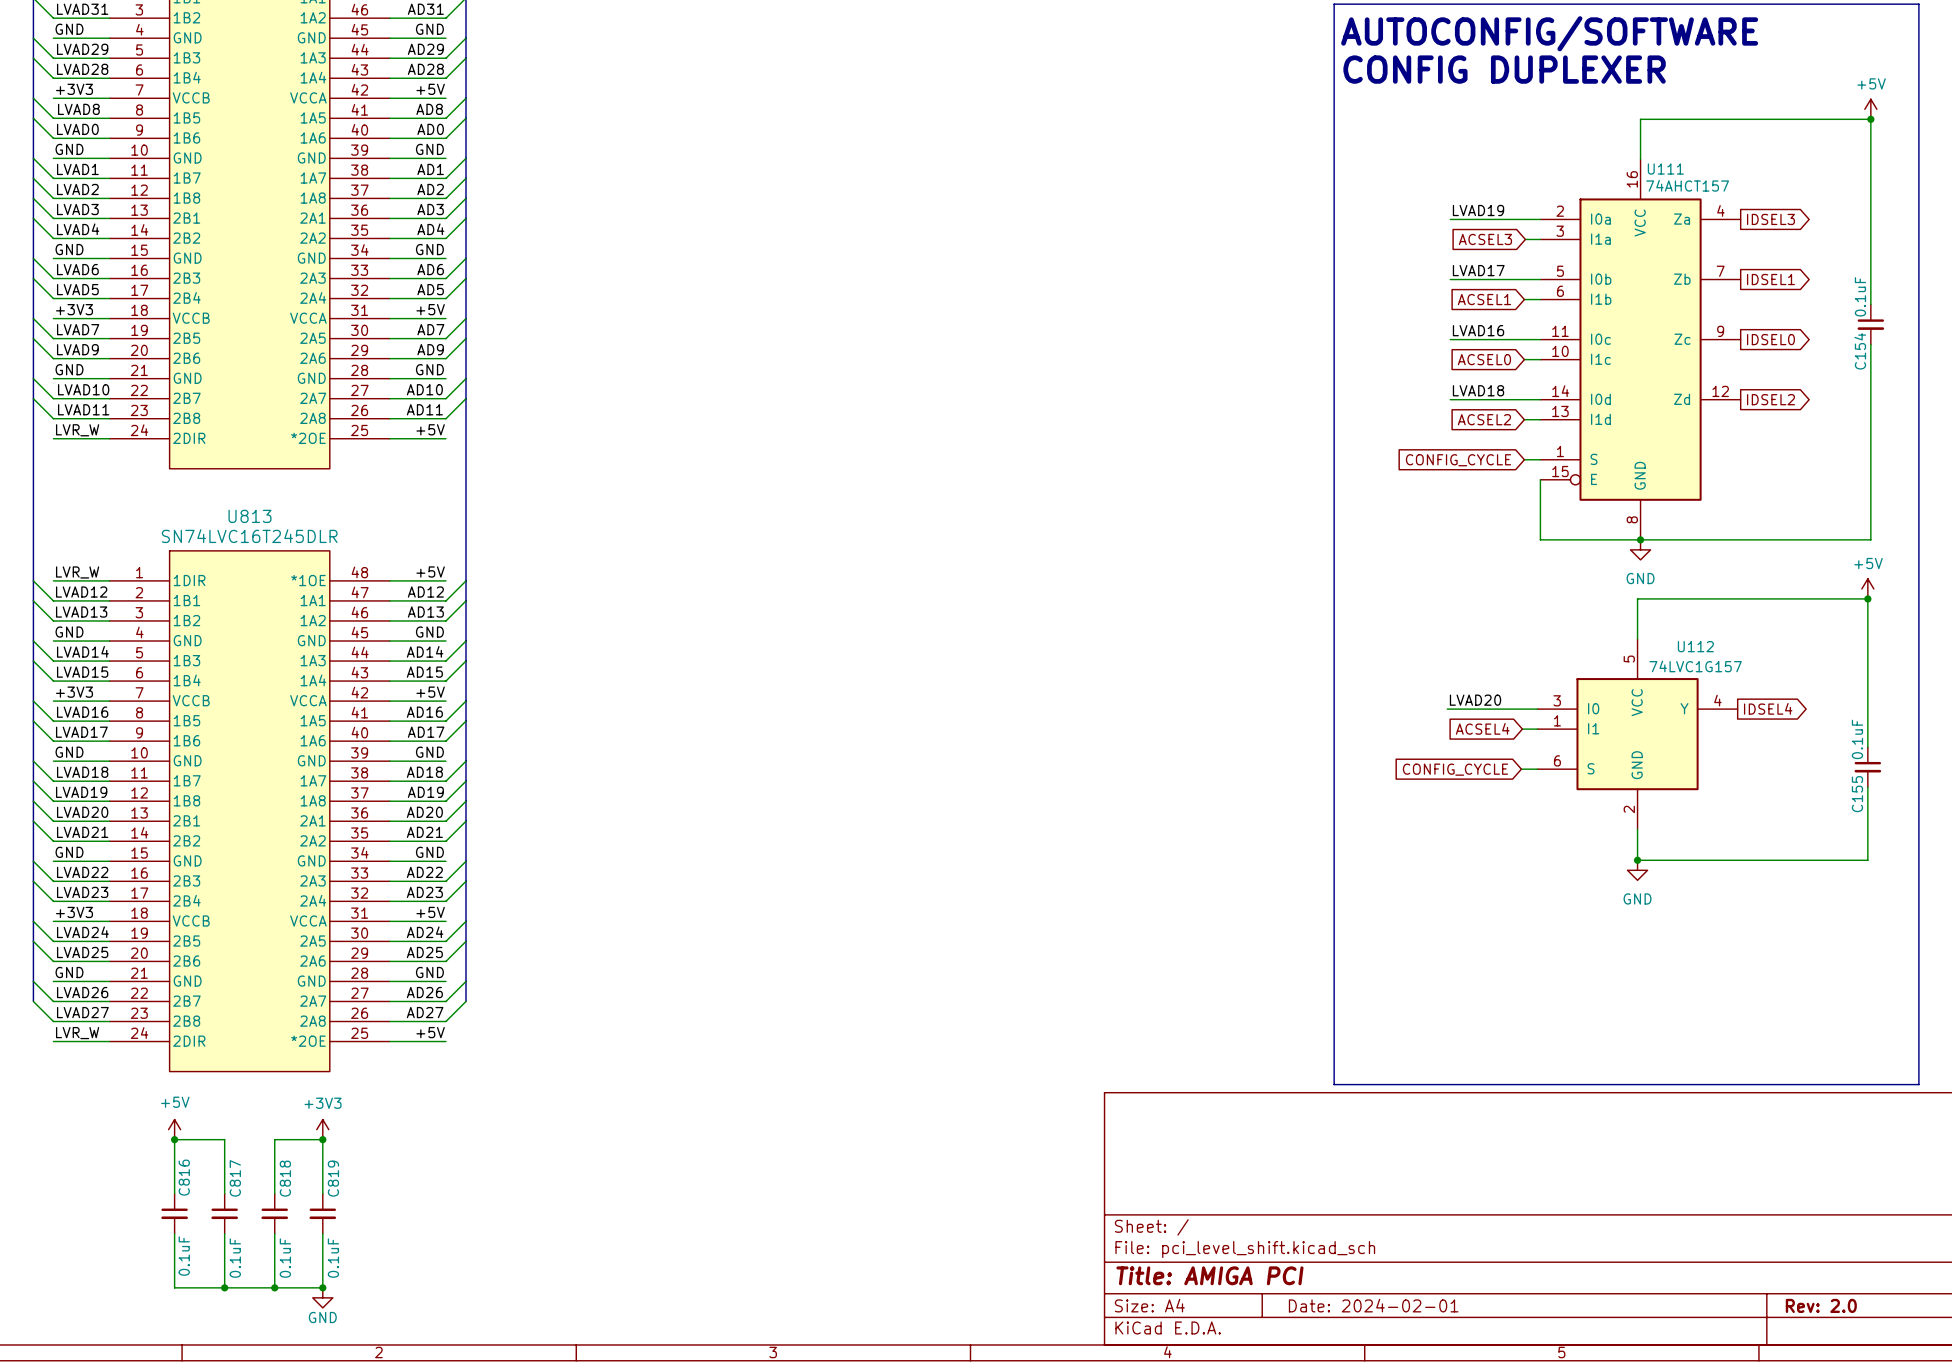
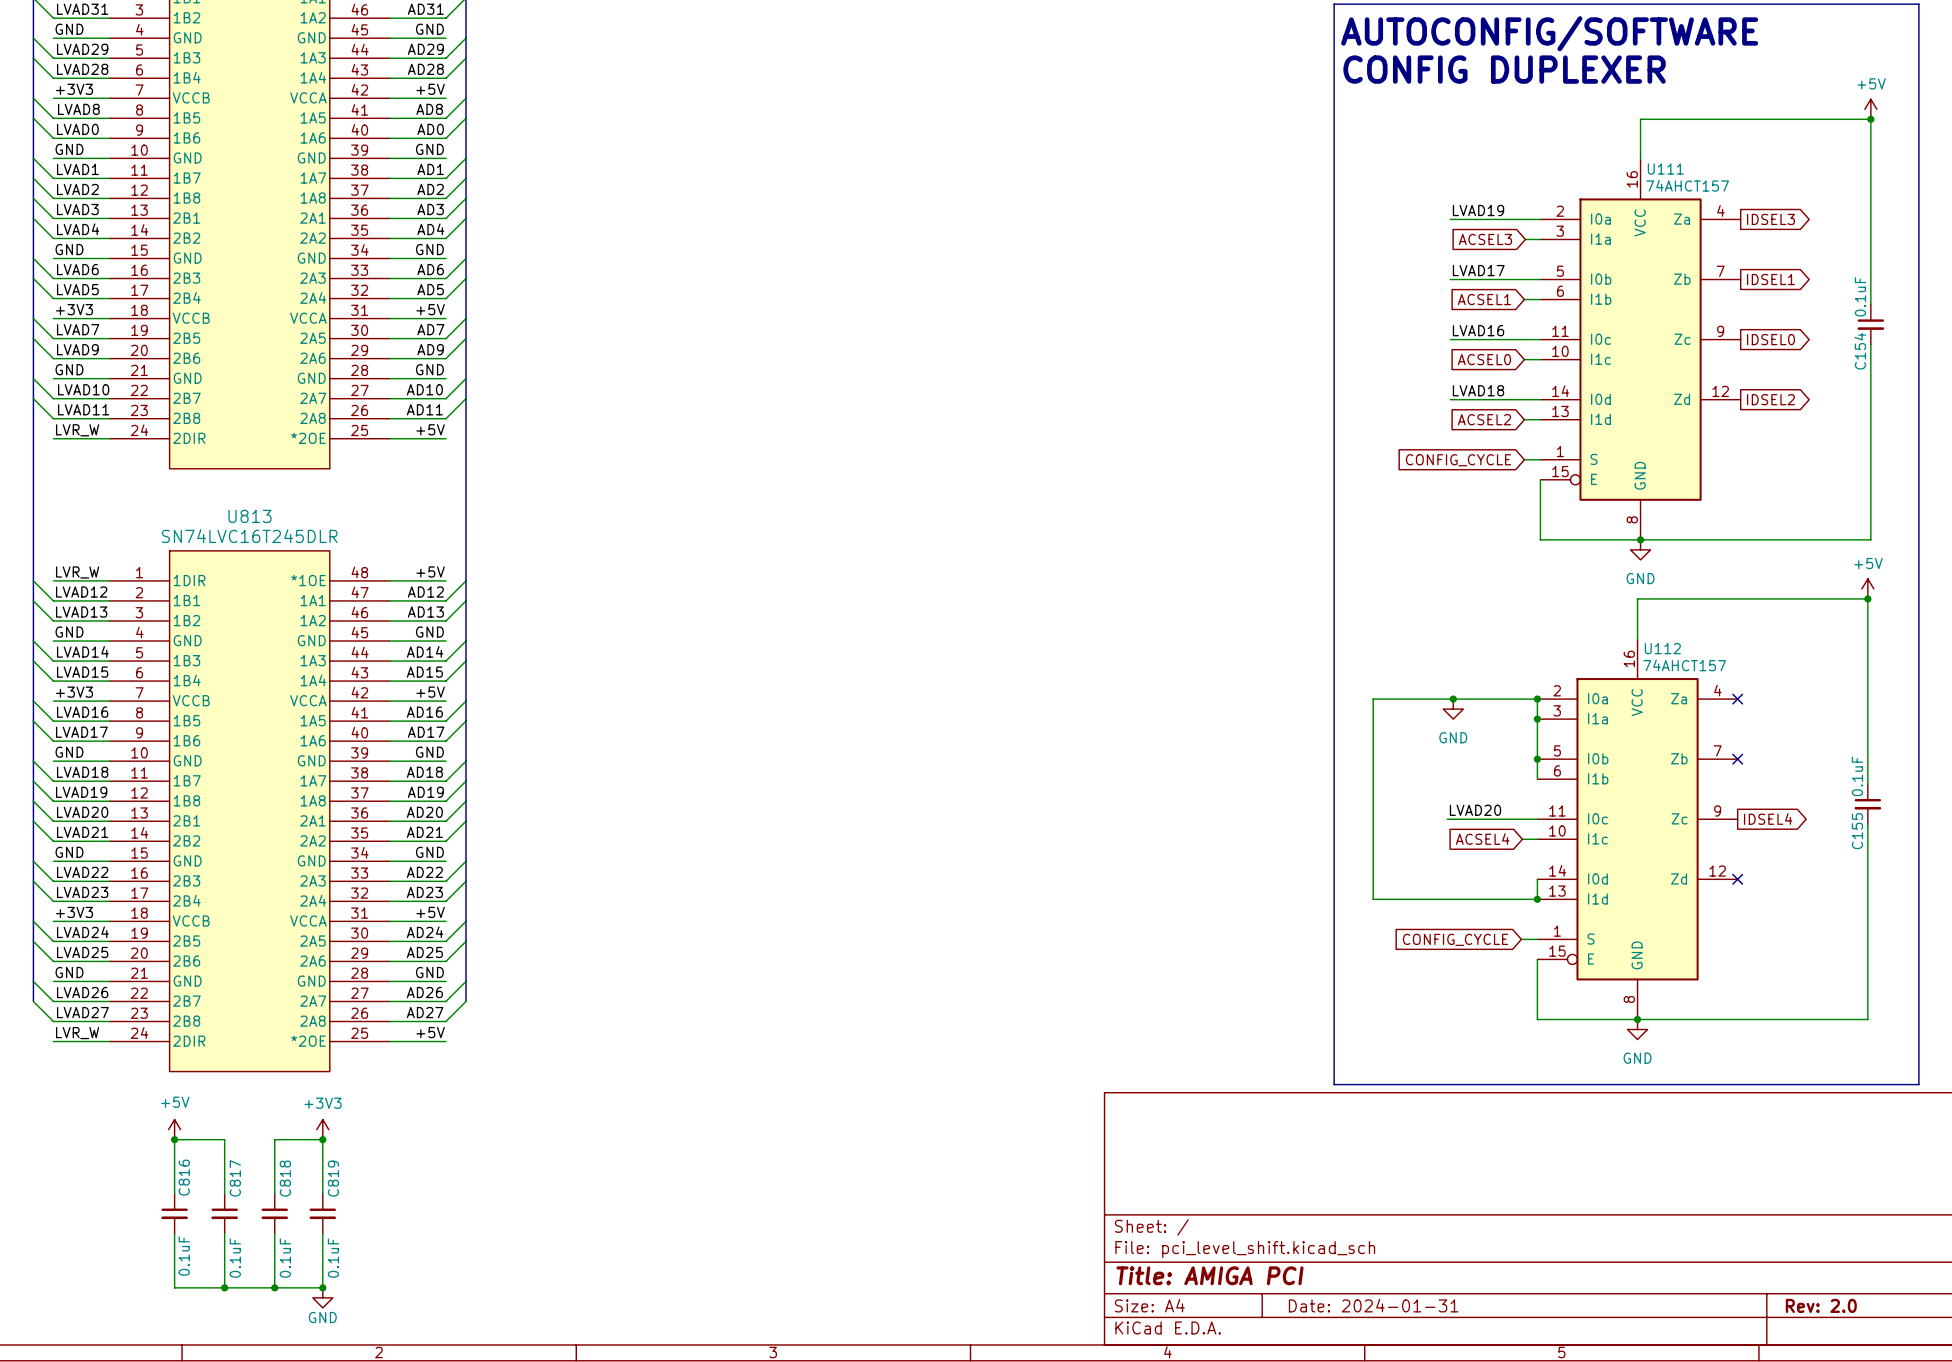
U112 symbol: [1537, 639, 1738, 830] -> [1537, 639, 1738, 1020]
U112 name position: U112 (1695, 646) -> U112 (1662, 648)
U112 value: 74LVC1G157 (1695, 666) -> 74AHCT157 (1684, 665)
junction: none -> (1453, 699)
junction: none -> (1537, 699)
no-connect mark: none -> (1737, 699)
label position: LVAD20 (1475, 700) -> LVAD20 (1475, 810)
global label position: IDSEL4 (1768, 708) -> IDSEL4 (1768, 819)
wire: (1447, 709) (1537, 709) -> (1447, 819) (1537, 819)
power symbol: none -> GND (1453, 709)
junction: none -> (1537, 719)
global label position: ACSEL4 (1482, 728) -> ACSEL4 (1482, 839)
wire: (1522, 729) (1537, 729) -> (1522, 839) (1537, 839)
junction: none -> (1537, 759)
no-connect mark: none -> (1737, 759)
C155 position: (1867, 767) -> (1867, 804)
global label position: CONFIG_CYCLE (1455, 769) -> CONFIG_CYCLE (1455, 939)
wire: (1521, 769) (1537, 769) -> (1521, 939) (1537, 939)
wire: none -> (1537, 779) (1537, 699) (1373, 699) (1373, 899) (1537, 899) (1537, 879)
wire: (1637, 829) (1637, 860) (1867, 860) -> (1537, 959) (1537, 1019) (1867, 1019) (1867, 860)
junction: (1637, 860) -> none
power symbol: GND (1637, 870) -> none
no-connect mark: none -> (1737, 879)
junction: none -> (1537, 899)
junction: none -> (1637, 1019)
power symbol: none -> GND (1637, 1029)
title block: Date: 2024-02-01 (1373, 1305) -> Date: 2024-01-31 (1373, 1305)

